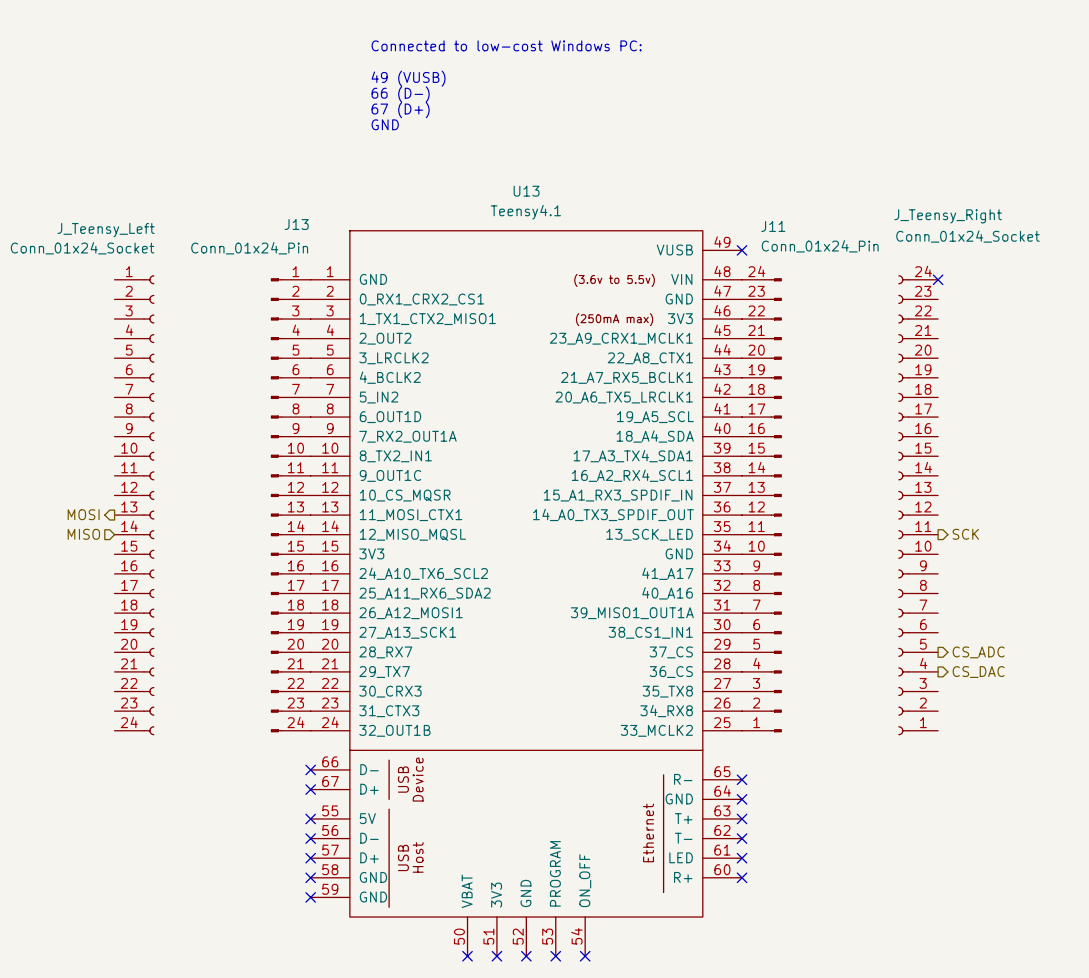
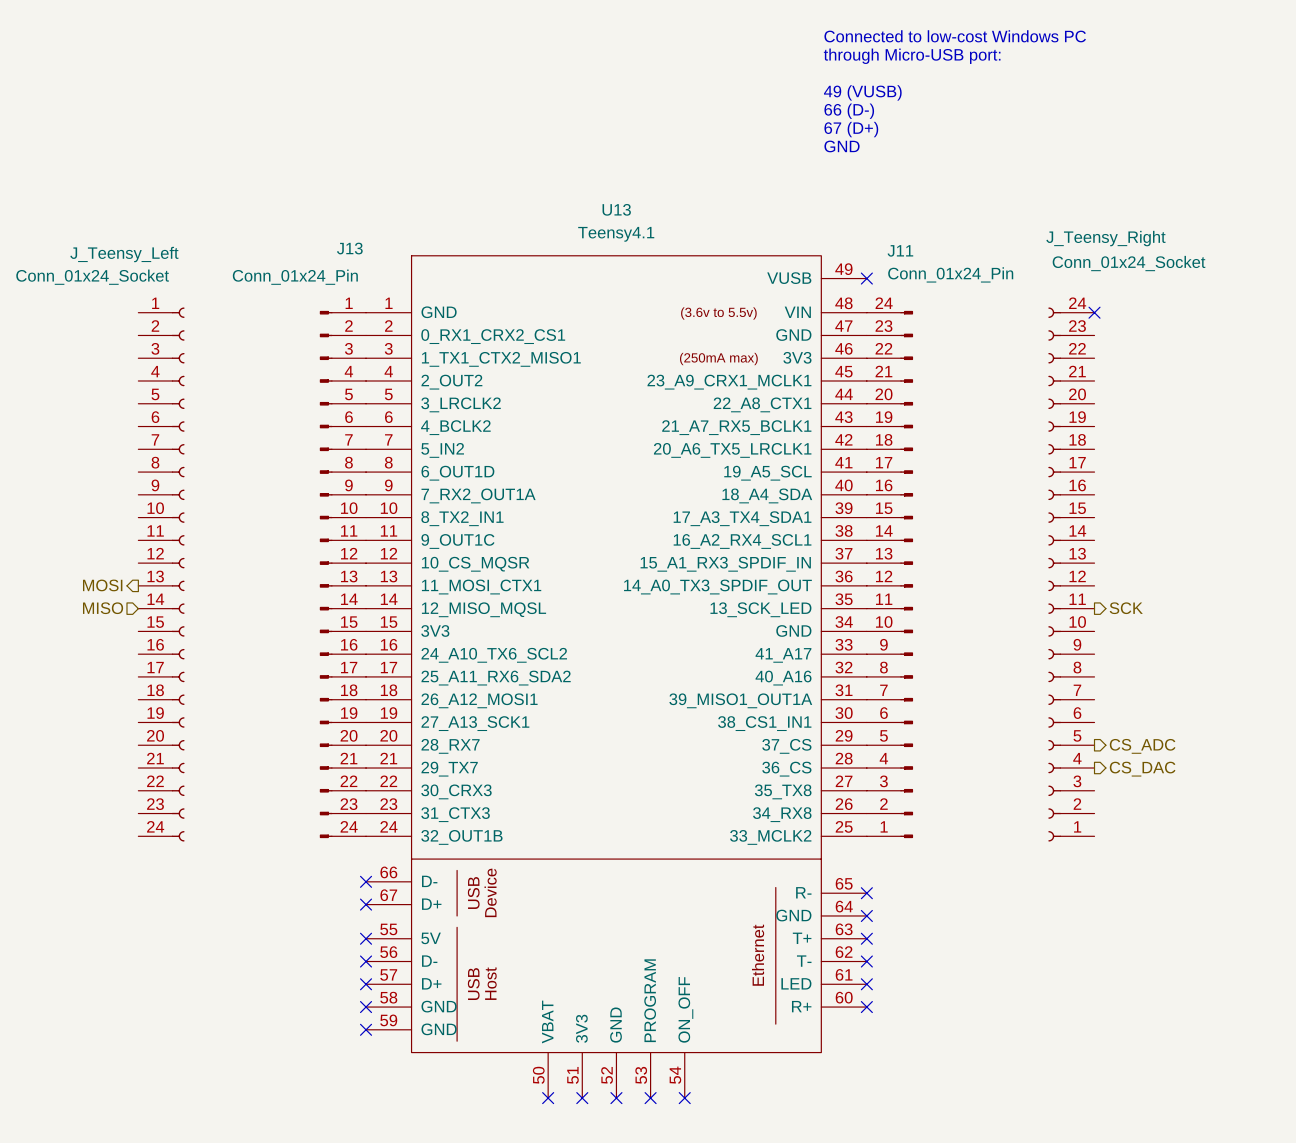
text: none -> Connected to low-cost Windows PC (955, 36)
text: Connected to low-cost Windows PC: (506, 45) -> none
text: none -> through Micro-USB port: (912, 56)
text: 49 (VUSB) (408, 78) -> none
text: none -> 49 (VUSB) (862, 92)
text: 66 (D-) (400, 94) -> none
text: none -> 66 (D-) (849, 111)
text: 67 (D+) (400, 110) -> none
text: none -> 67 (D+) (851, 129)
text: GND (385, 124) -> none
text: none -> GND (842, 146)

